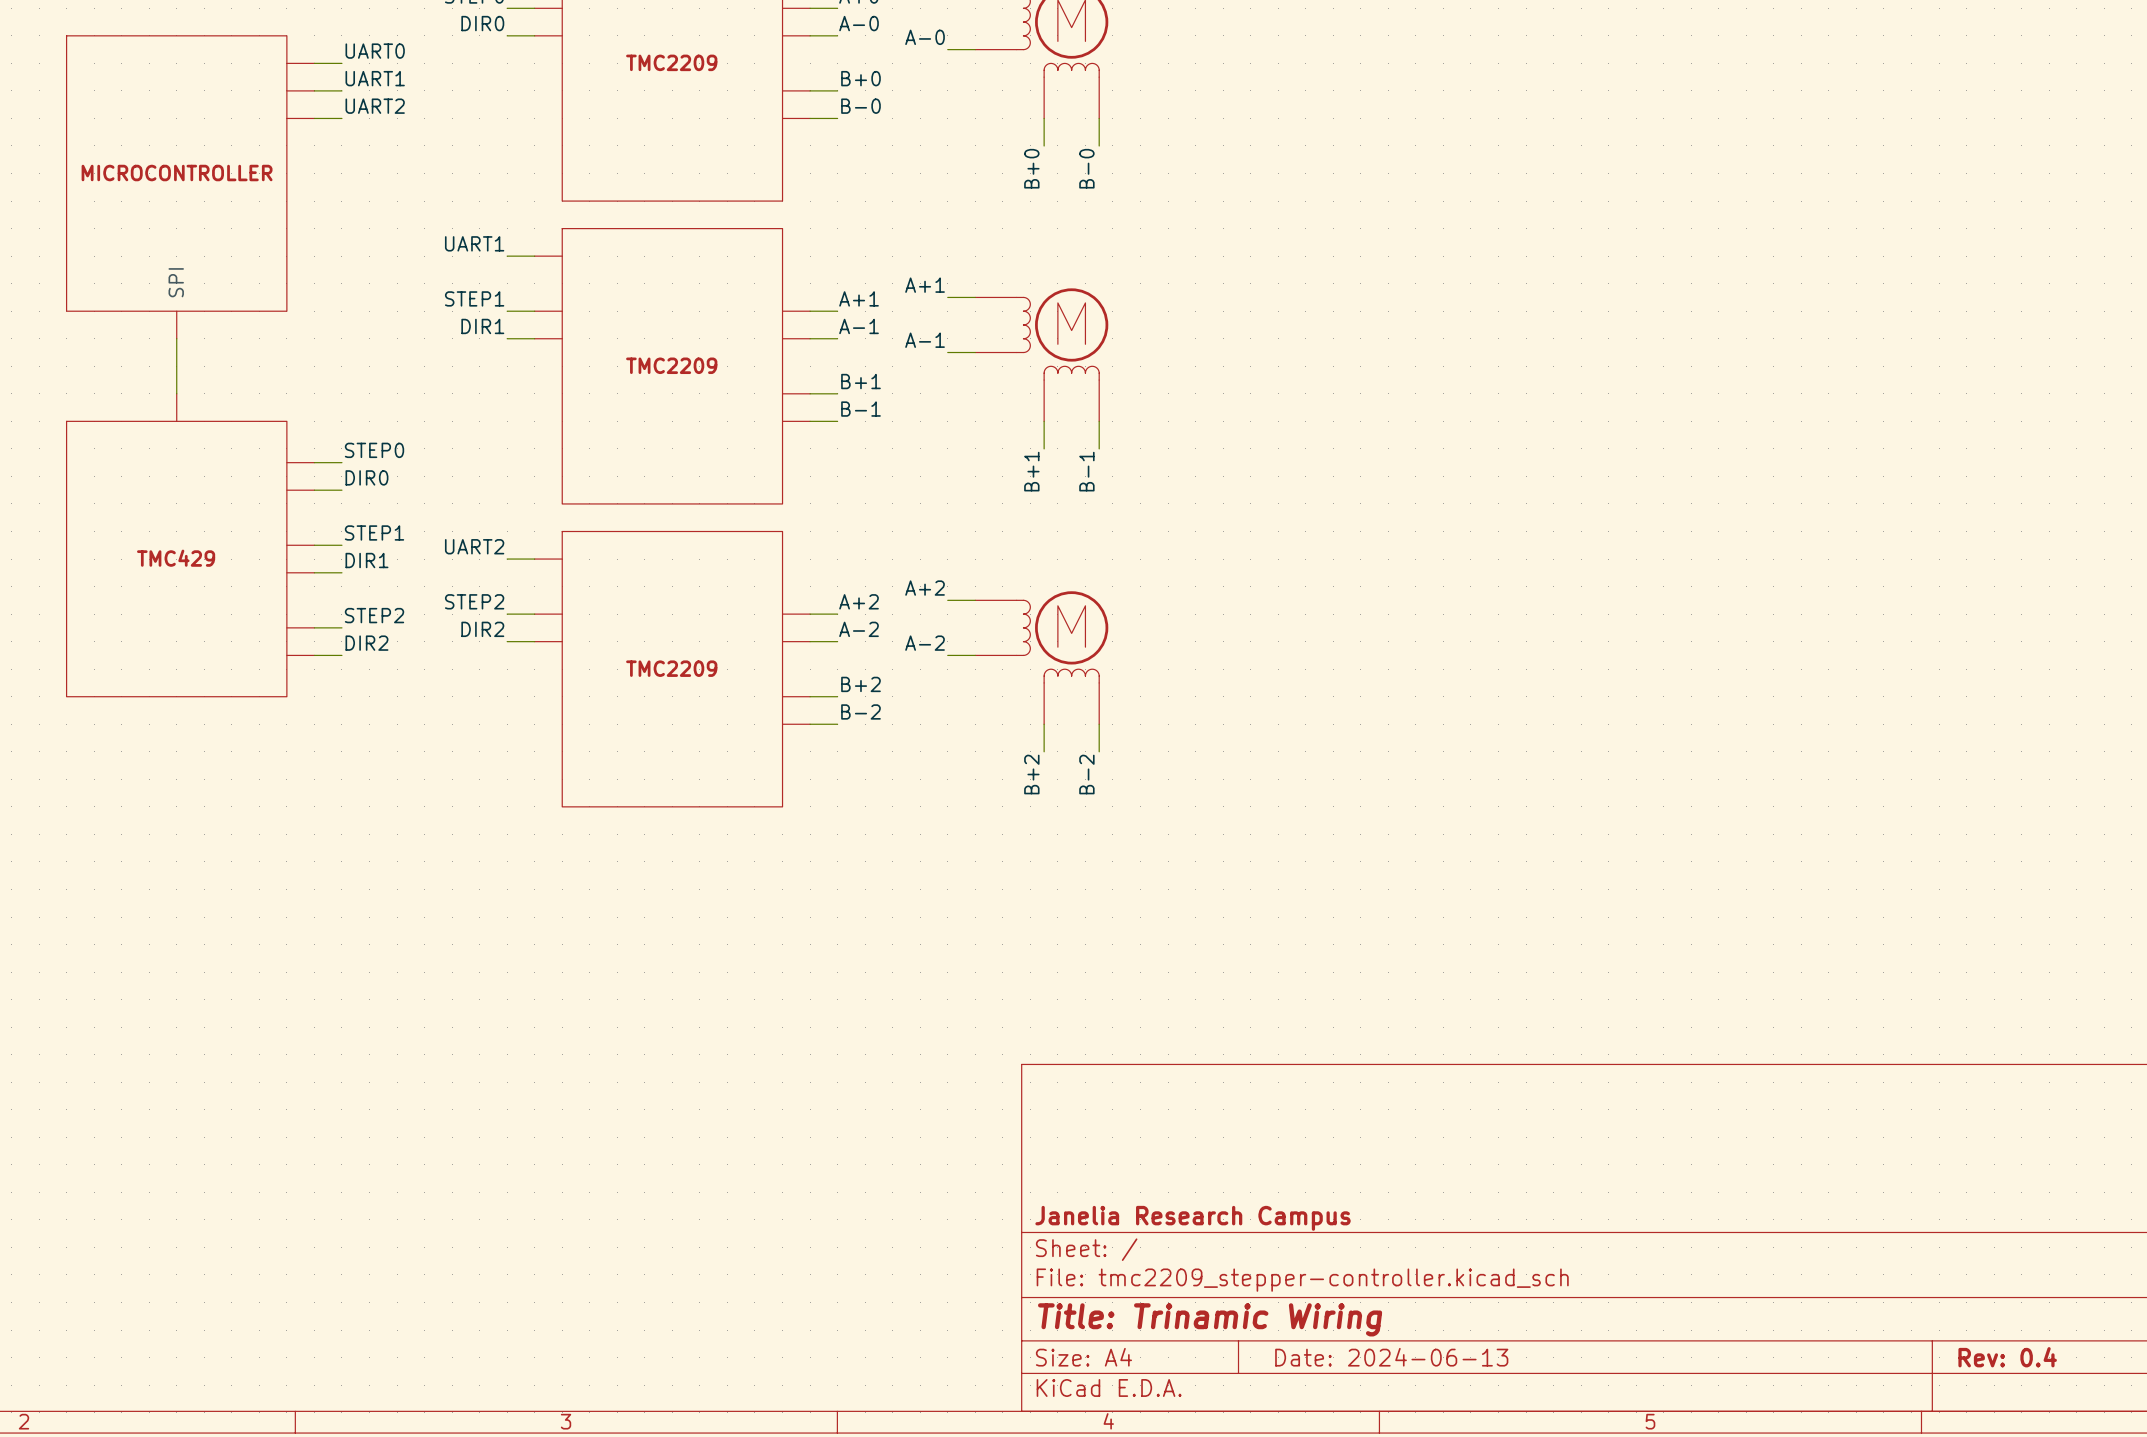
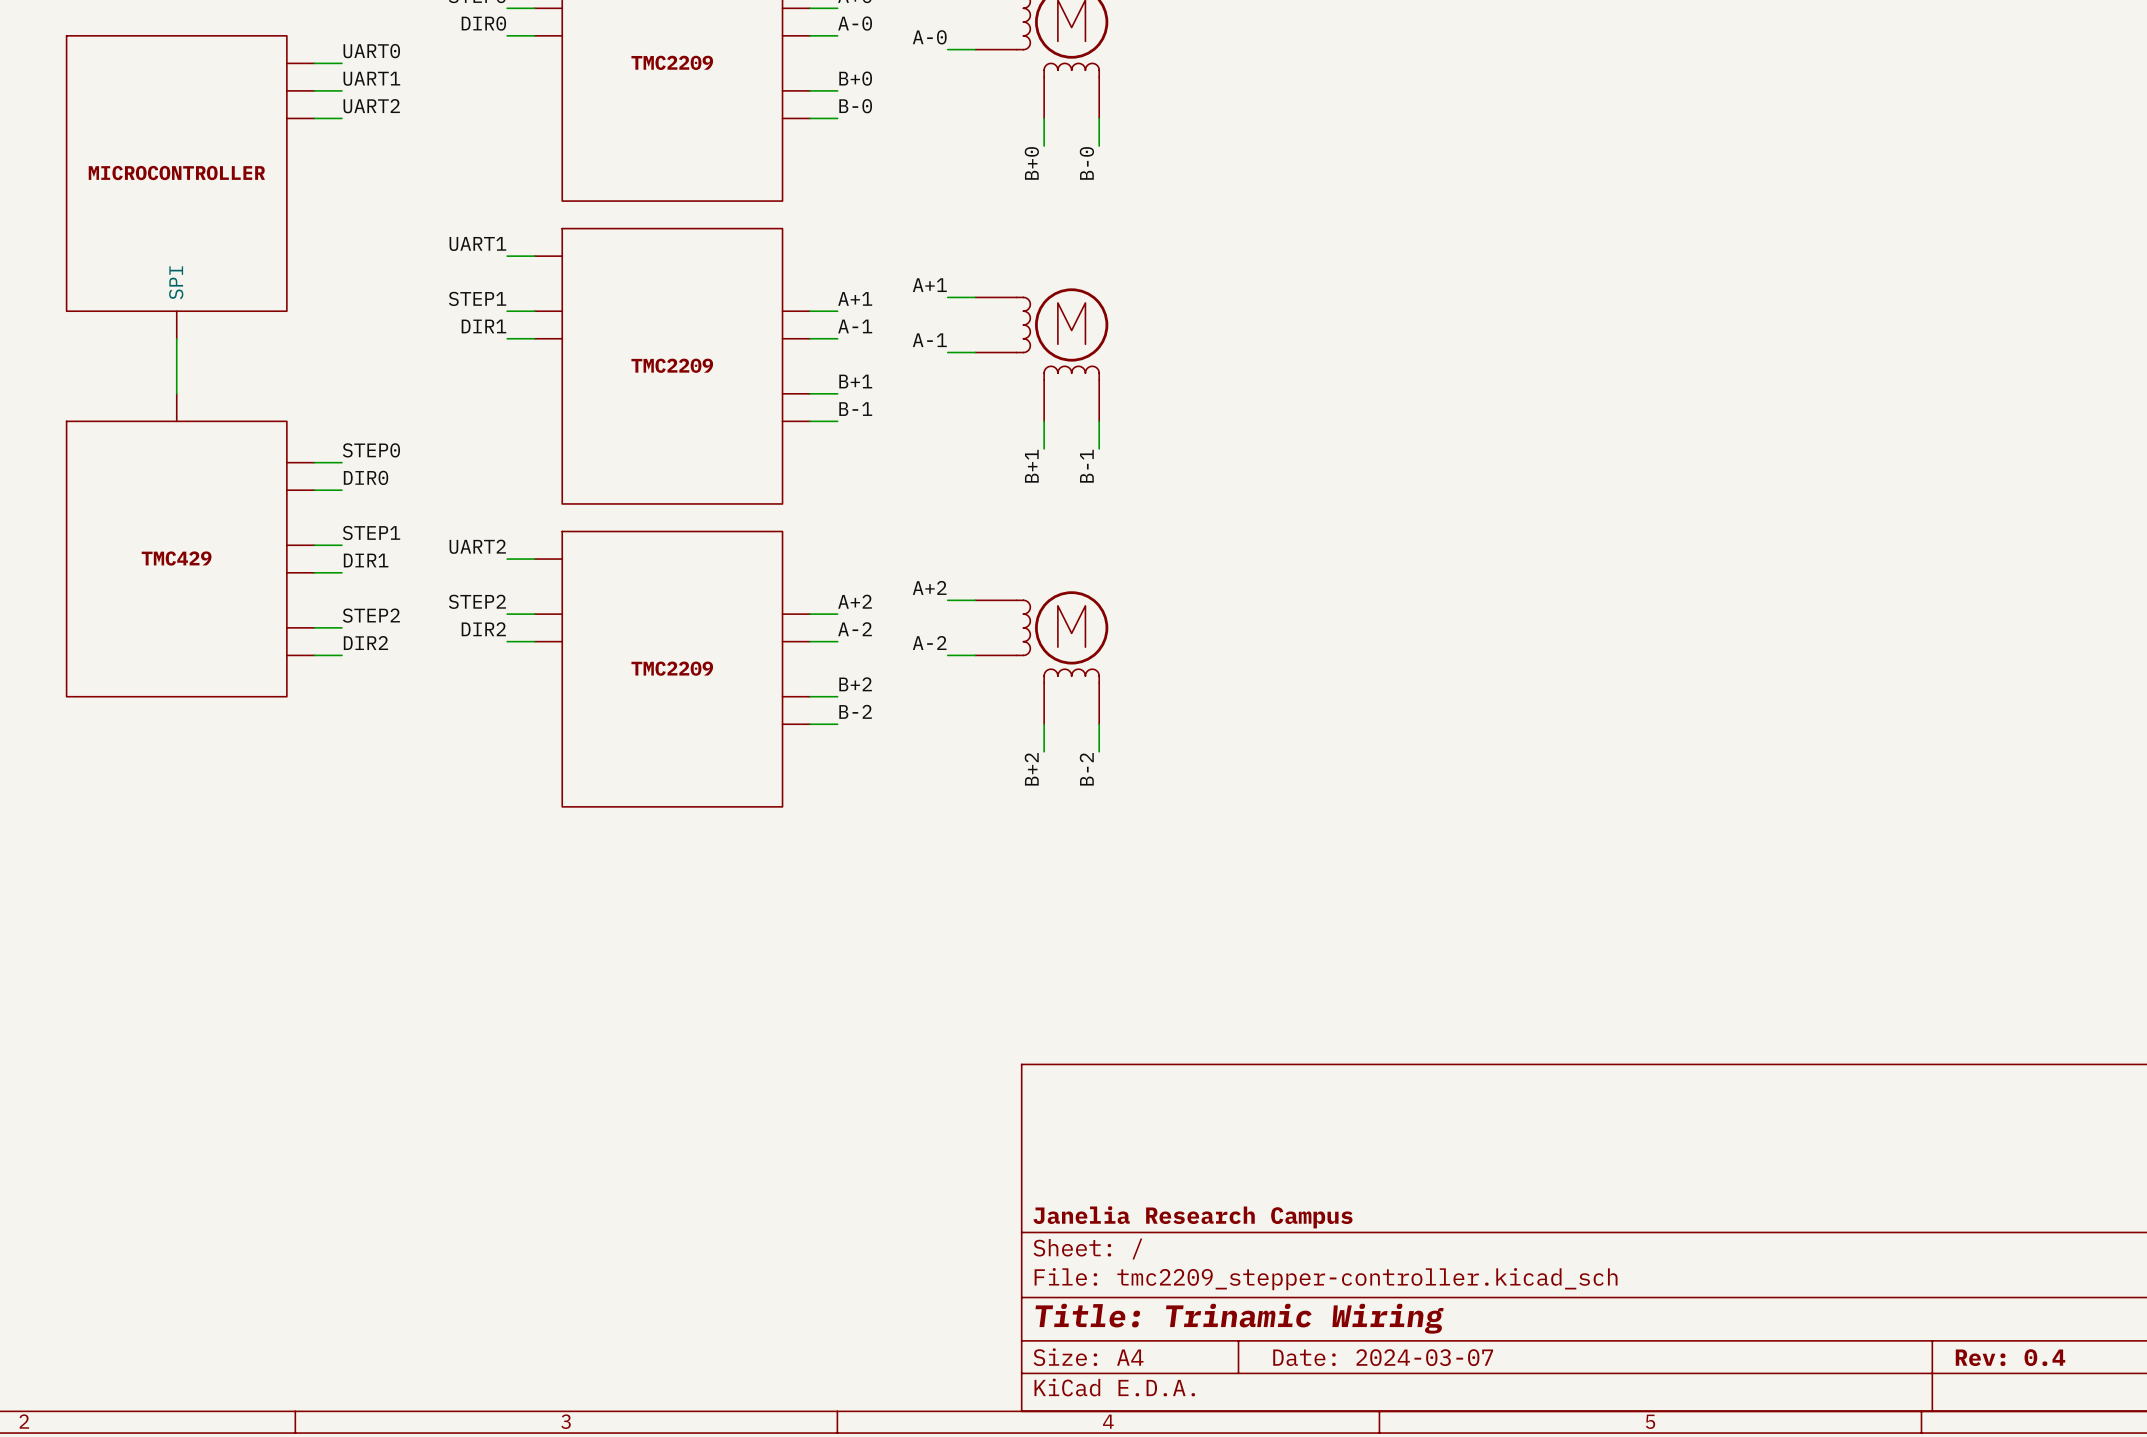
title block: Date: 2024-06-13 (1391, 1357) -> Date: 2024-03-07 (1383, 1357)

